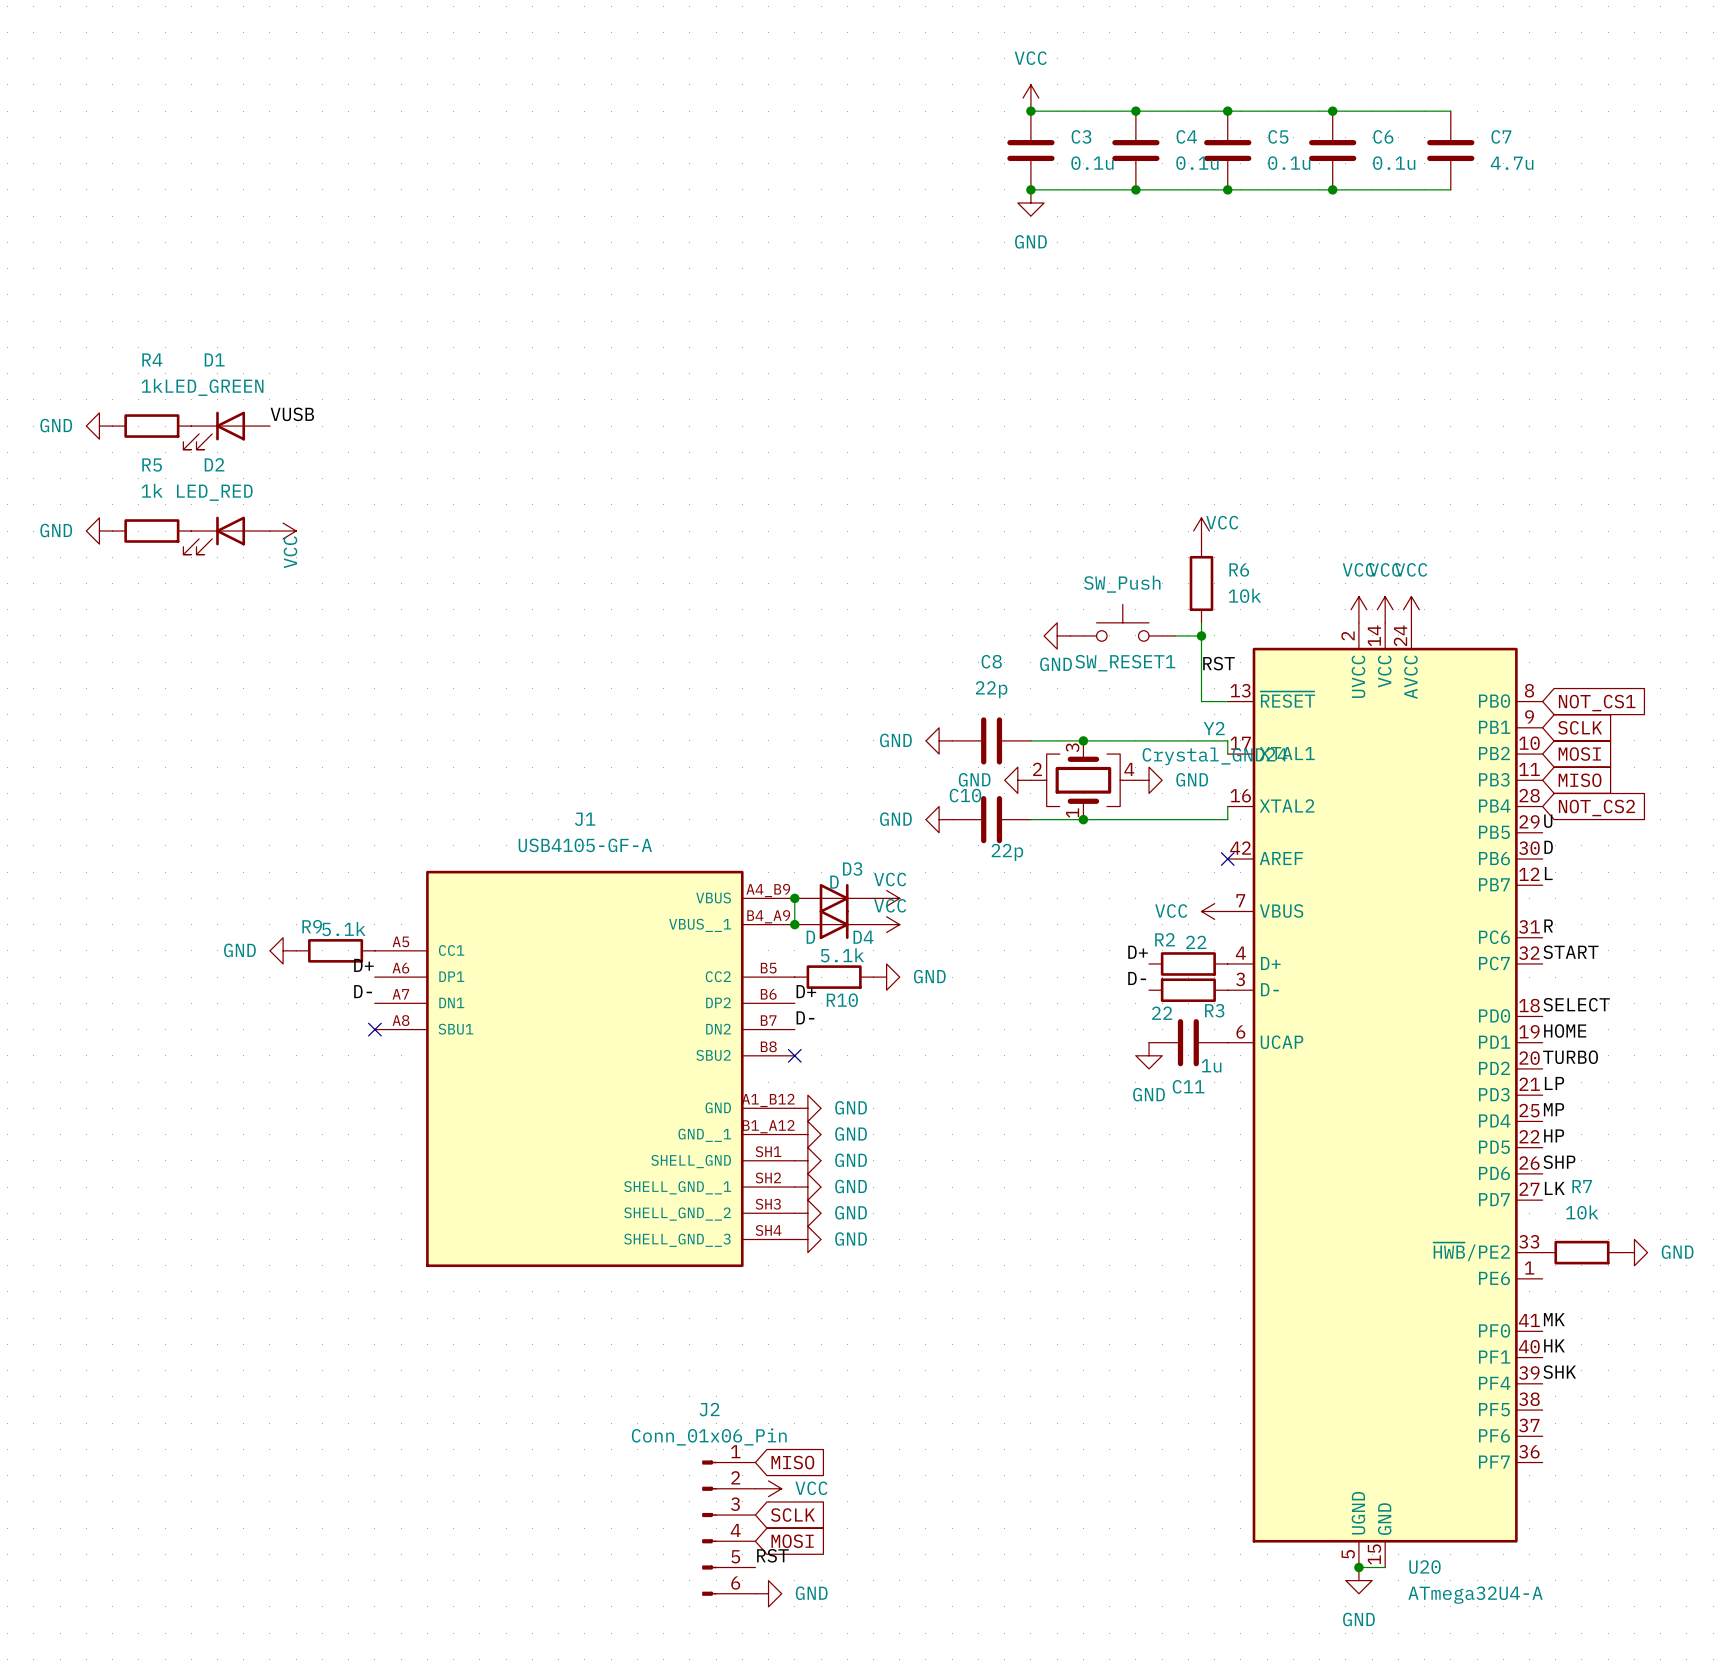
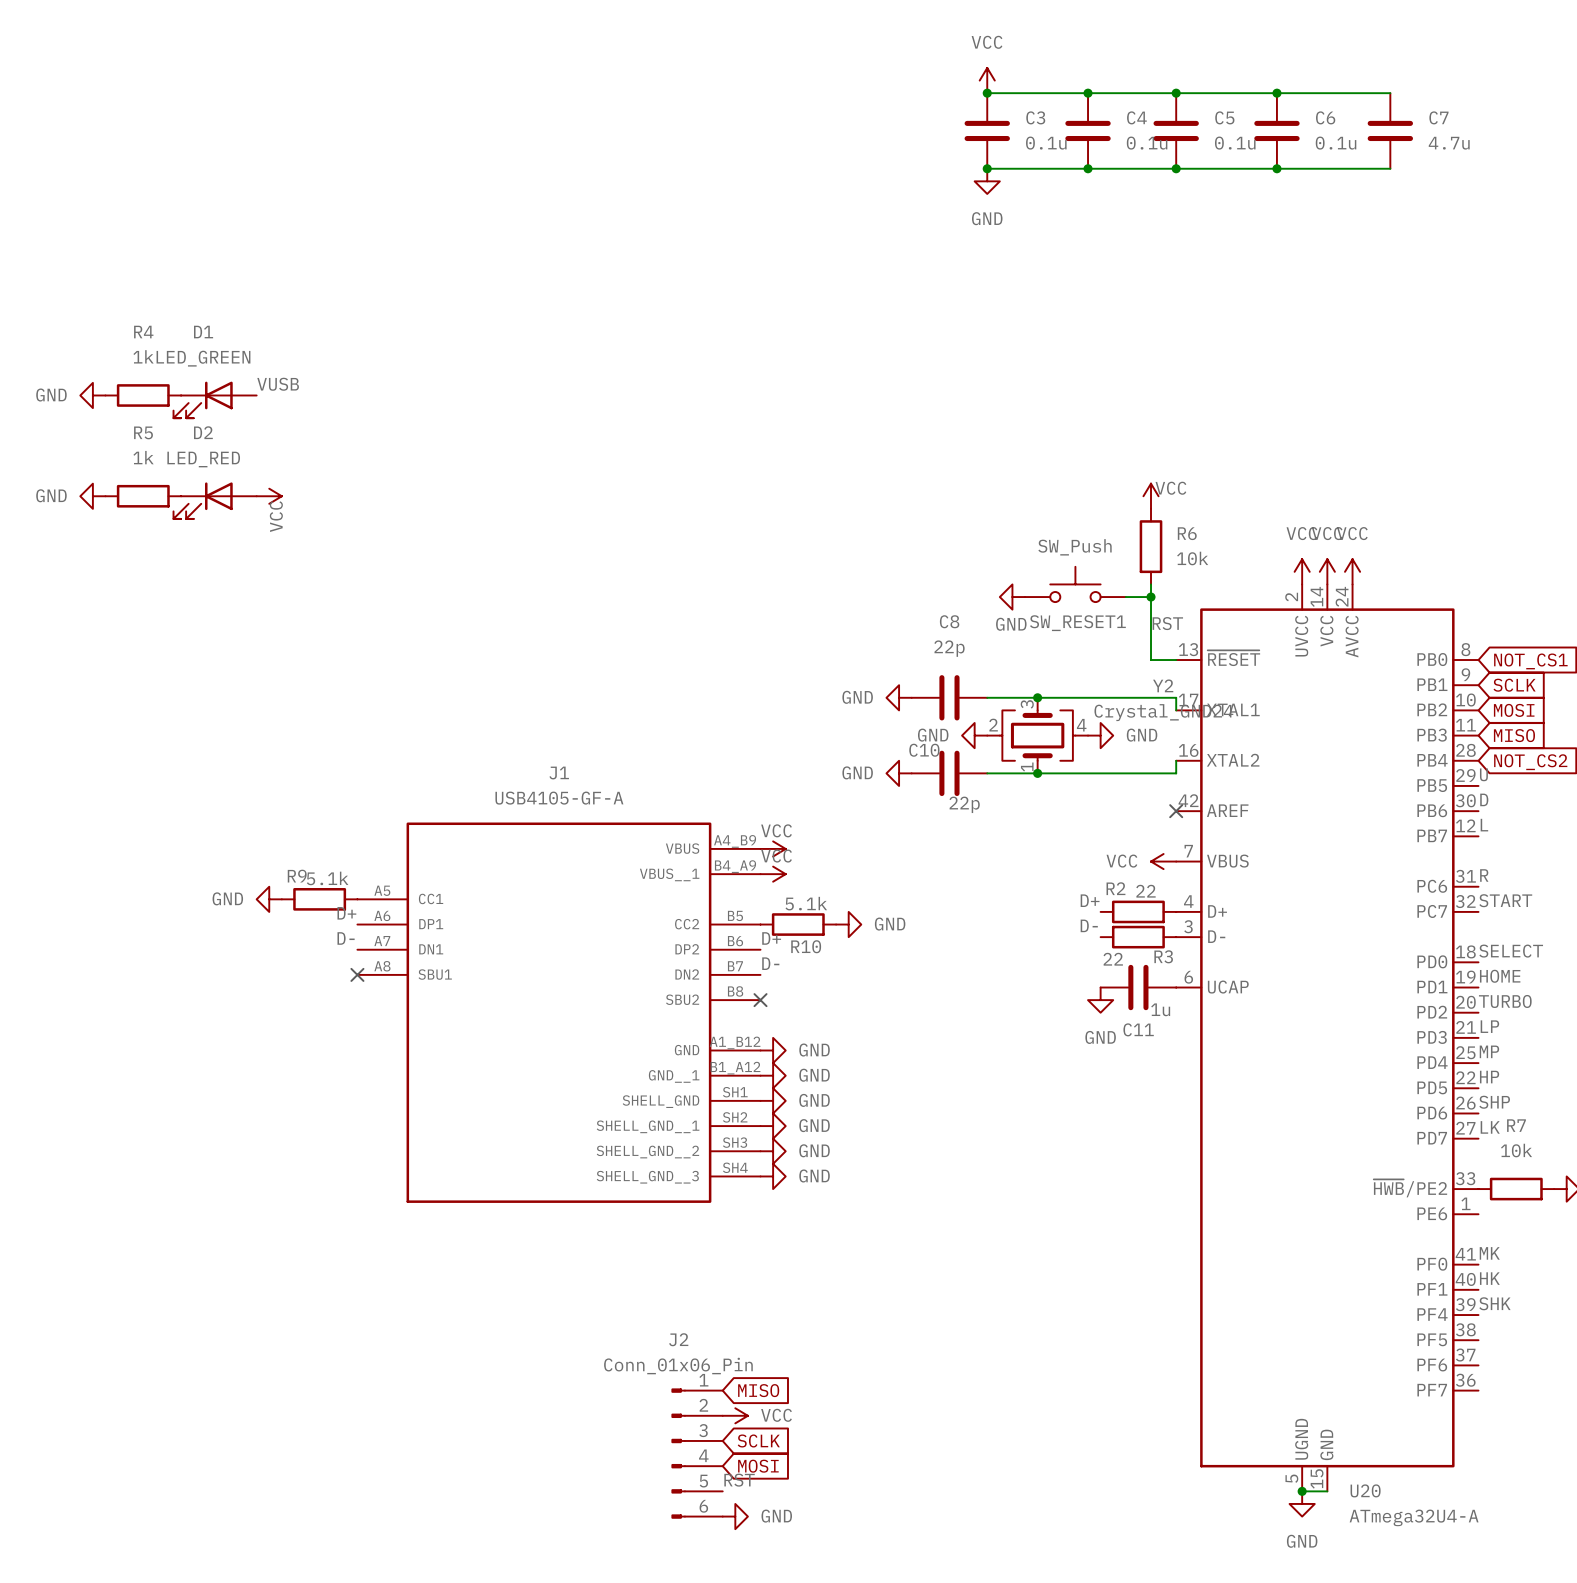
wire: (794, 898) (794, 924) -> none
junction: (794, 898) -> none
power symbol: none -> VCC (773, 848)
D3: D (834, 898) -> none
power symbol: VCC (886, 898) -> none
junction: (794, 924) -> none
power symbol: none -> VCC (773, 874)
D4: D (834, 924) -> none
power symbol: VCC (886, 924) -> none

